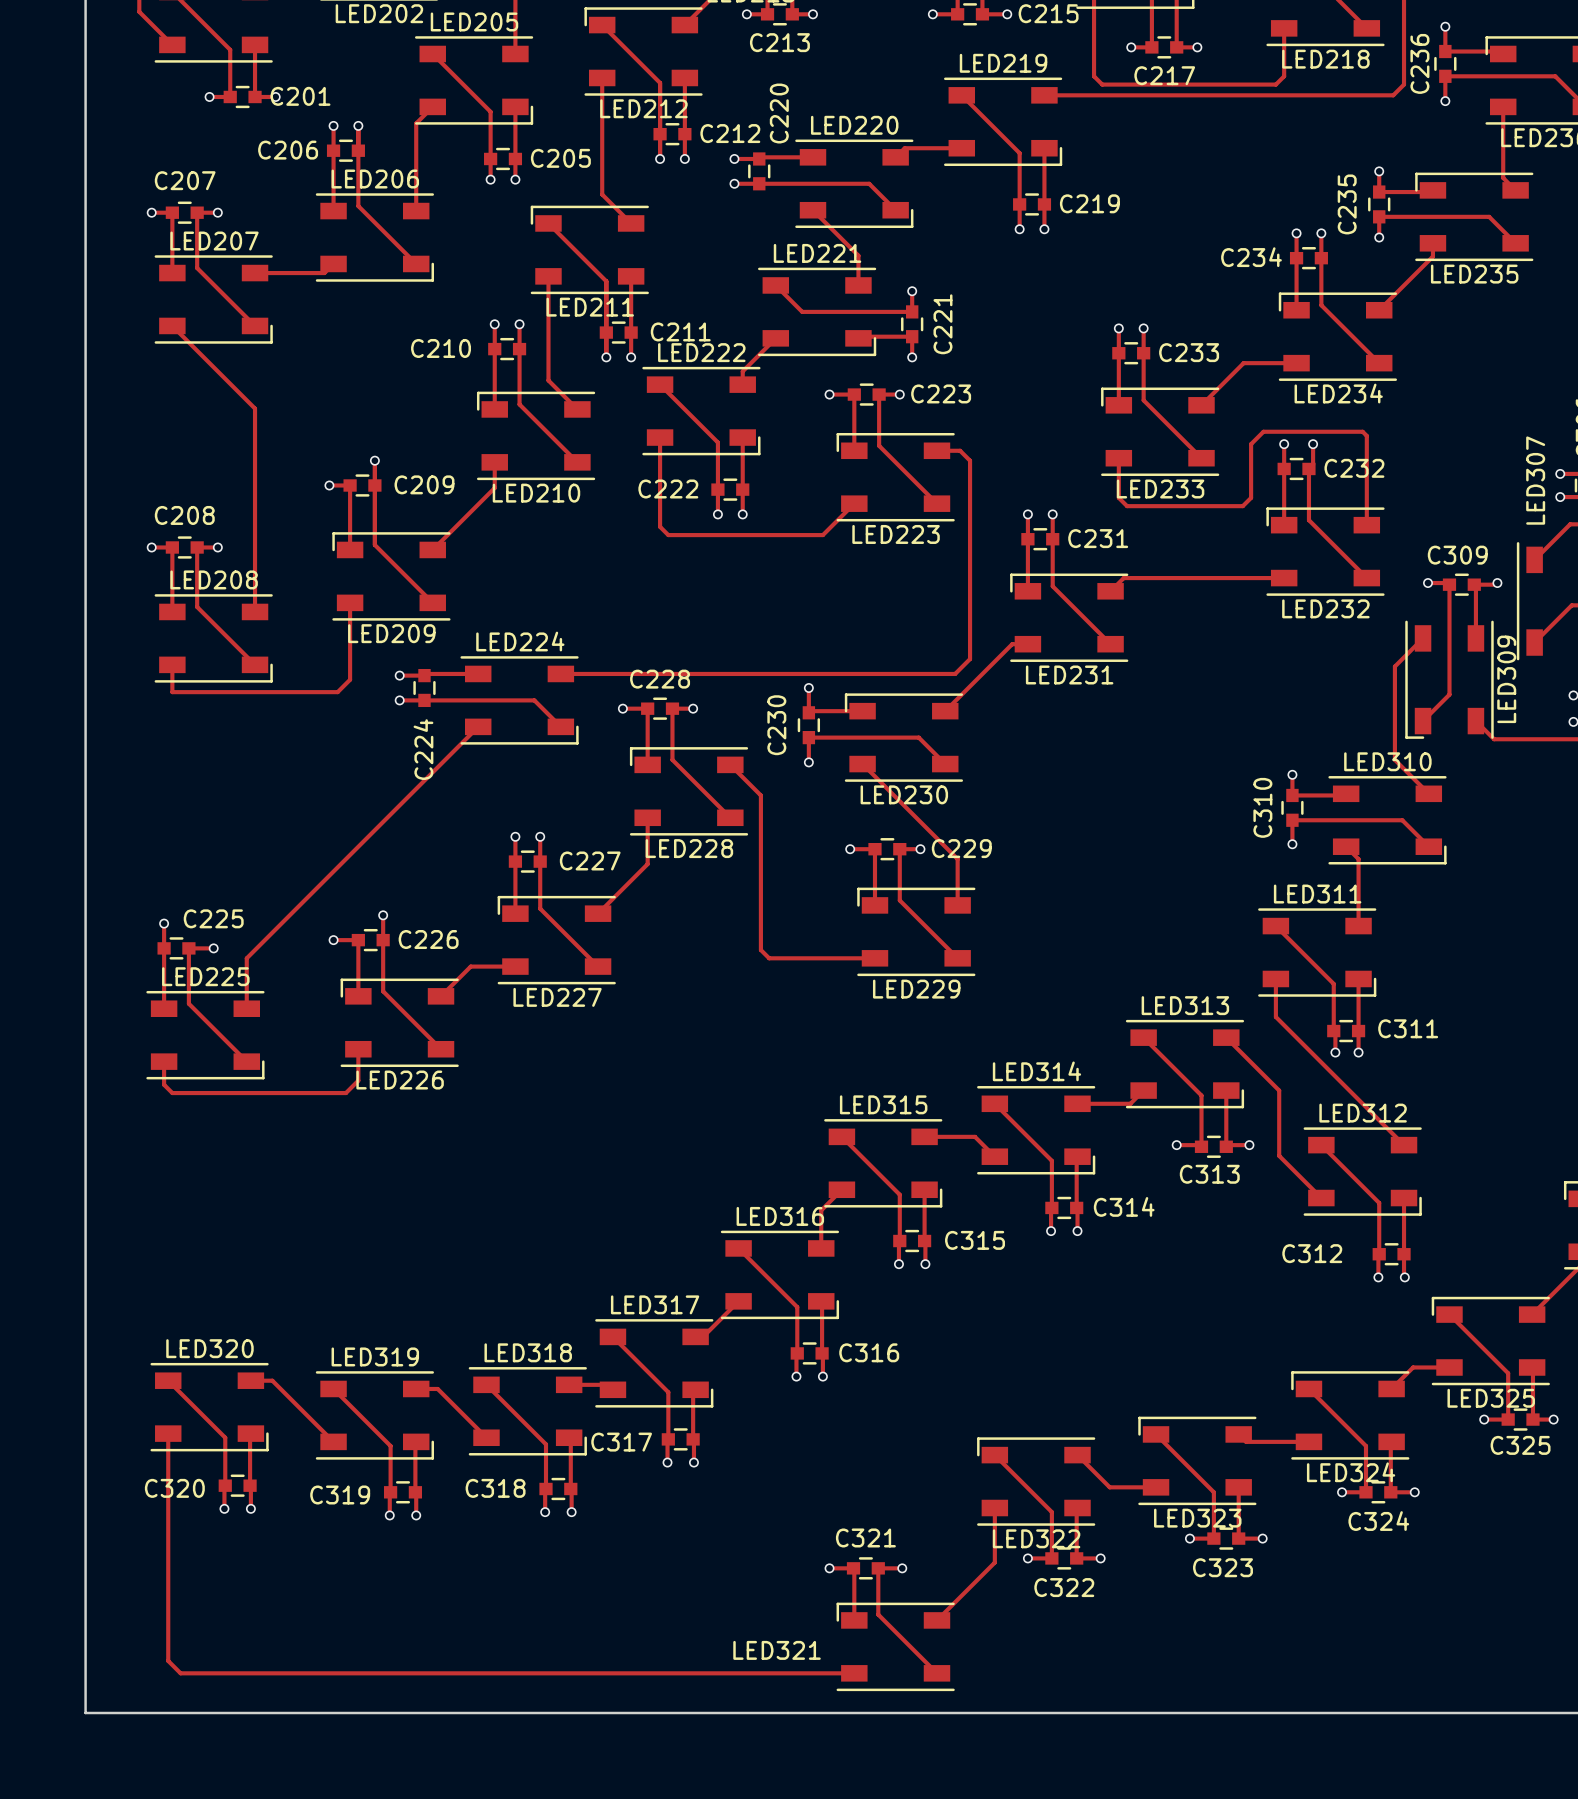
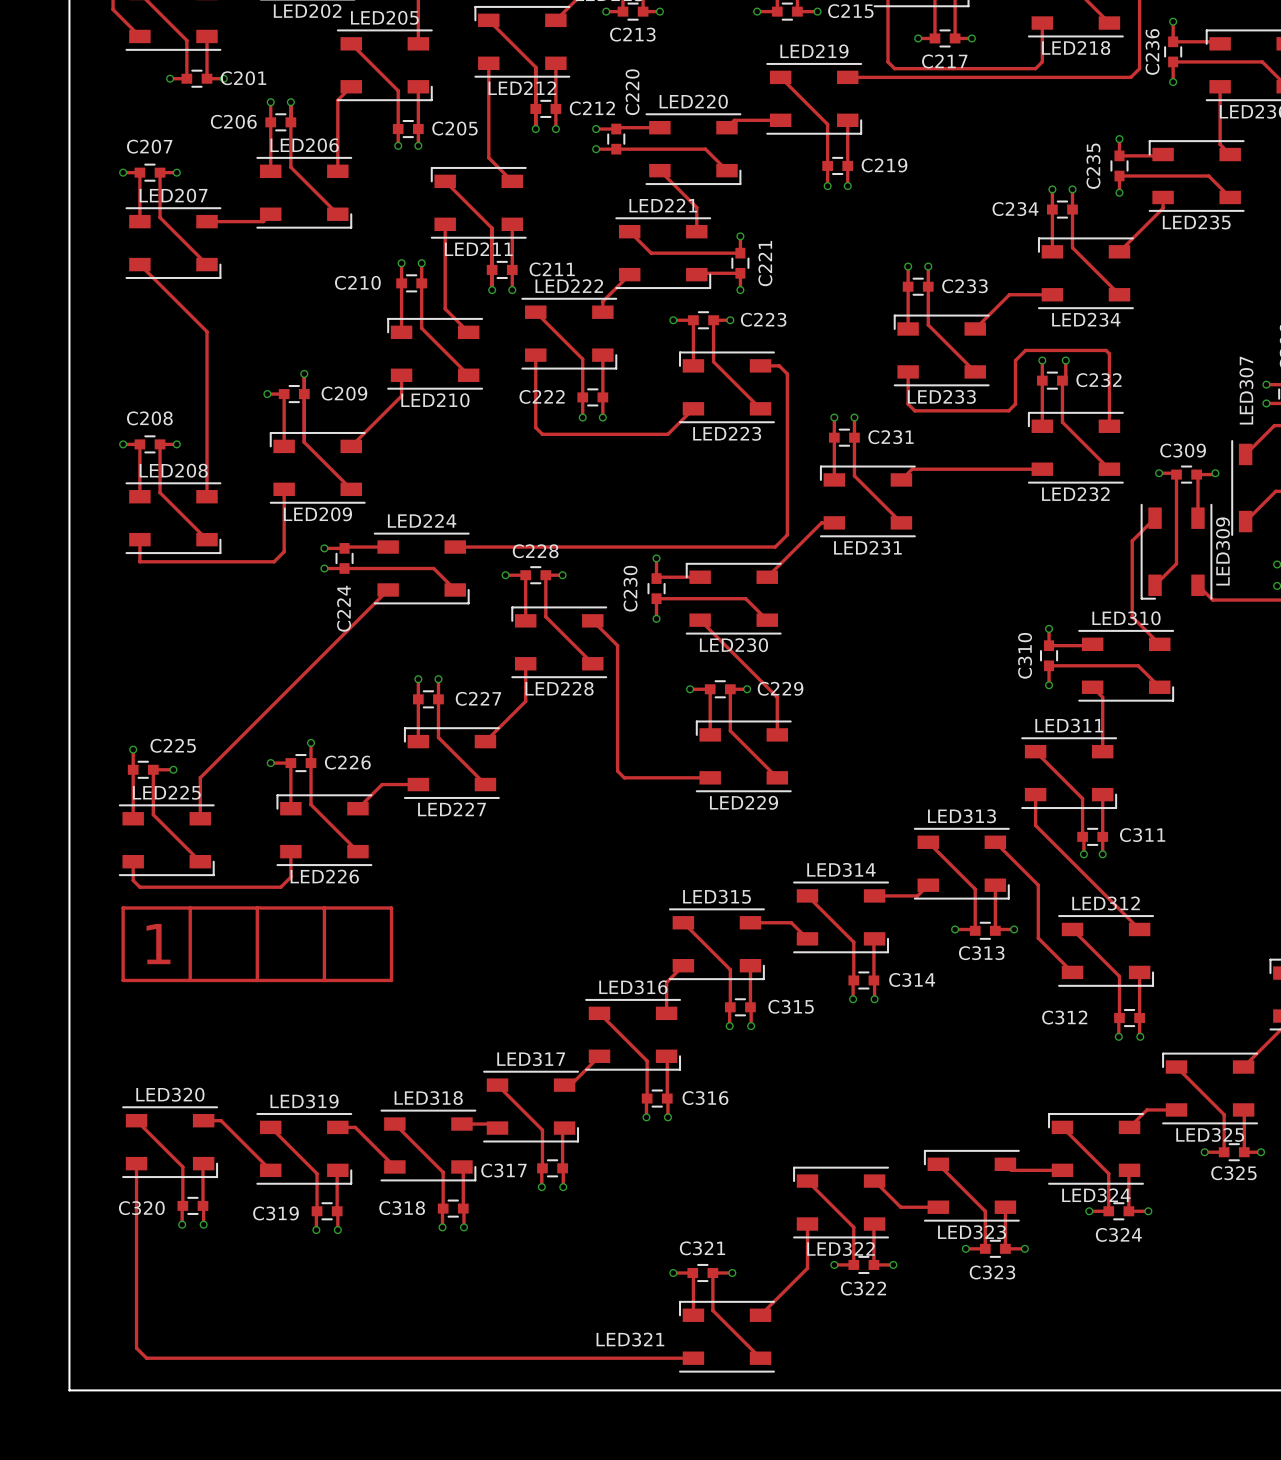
track: none -> (123, 908) (391, 908) (391, 980) (123, 980) (123, 908)
track: none -> (190, 908) (190, 980)
track: none -> (257, 908) (257, 980)
track: none -> (324, 908) (324, 980)
text: none -> 1 (158, 944)

